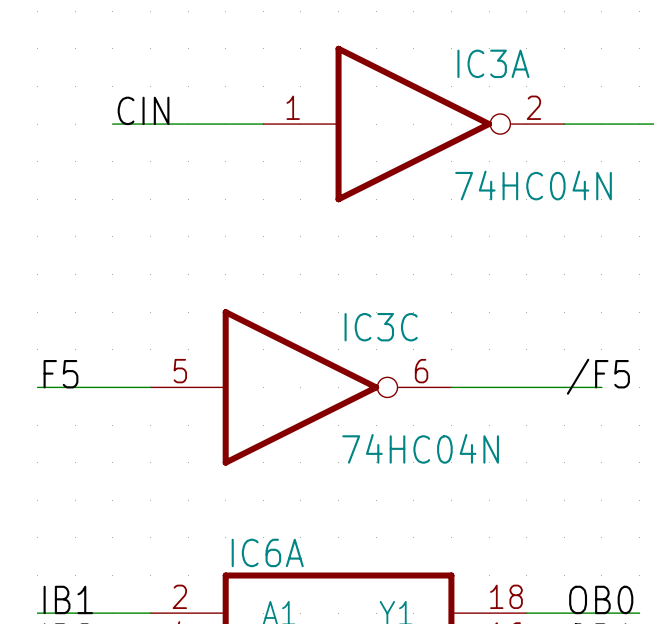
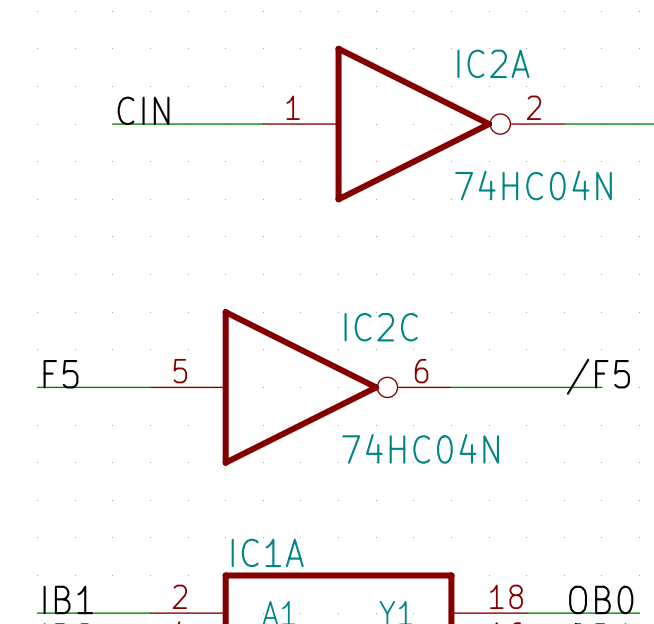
IC3A name: IC3A (493, 63) -> IC2A (493, 63)
IC3C name: IC3C (381, 327) -> IC2C (381, 327)
IC6A name: IC6A (267, 552) -> IC1A (267, 552)

